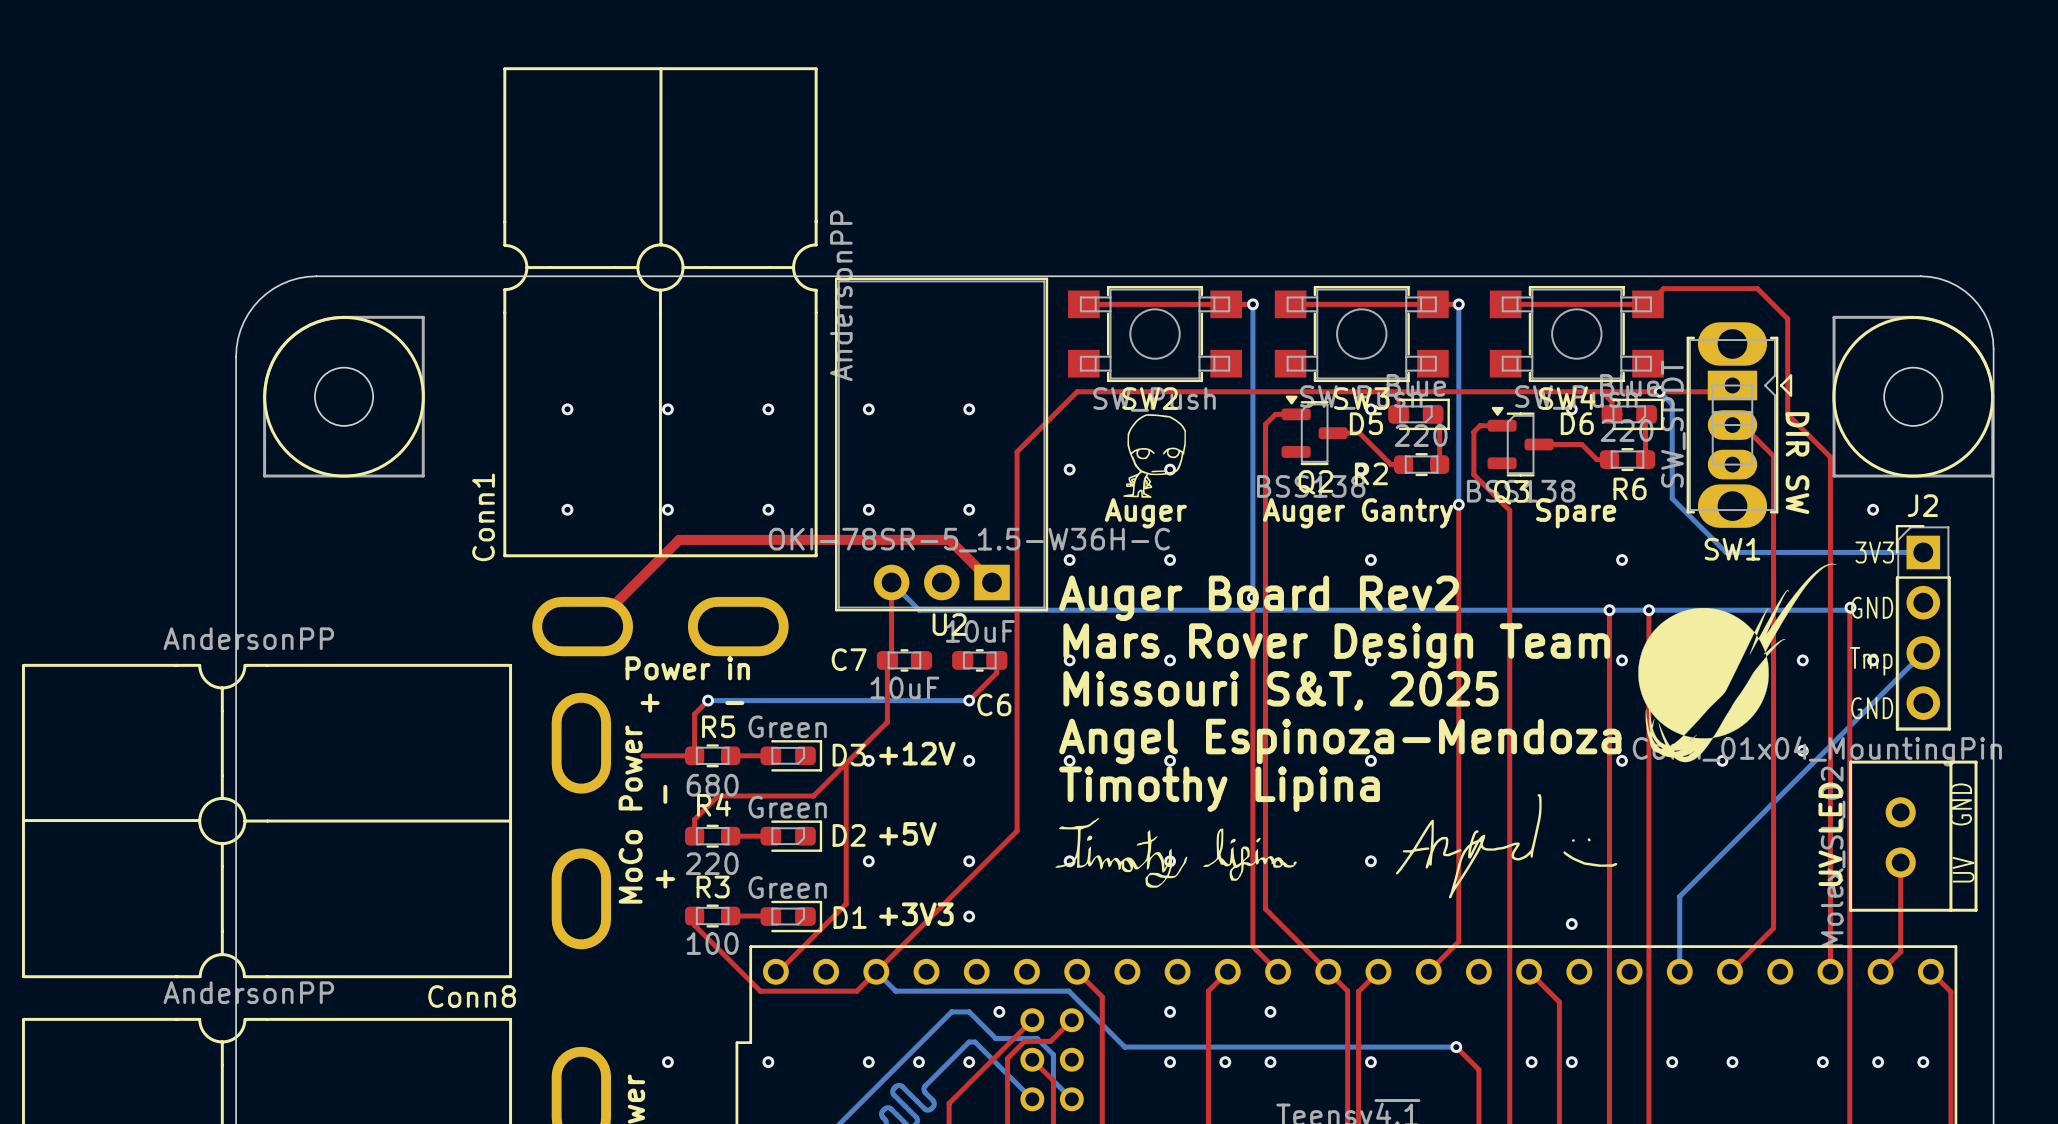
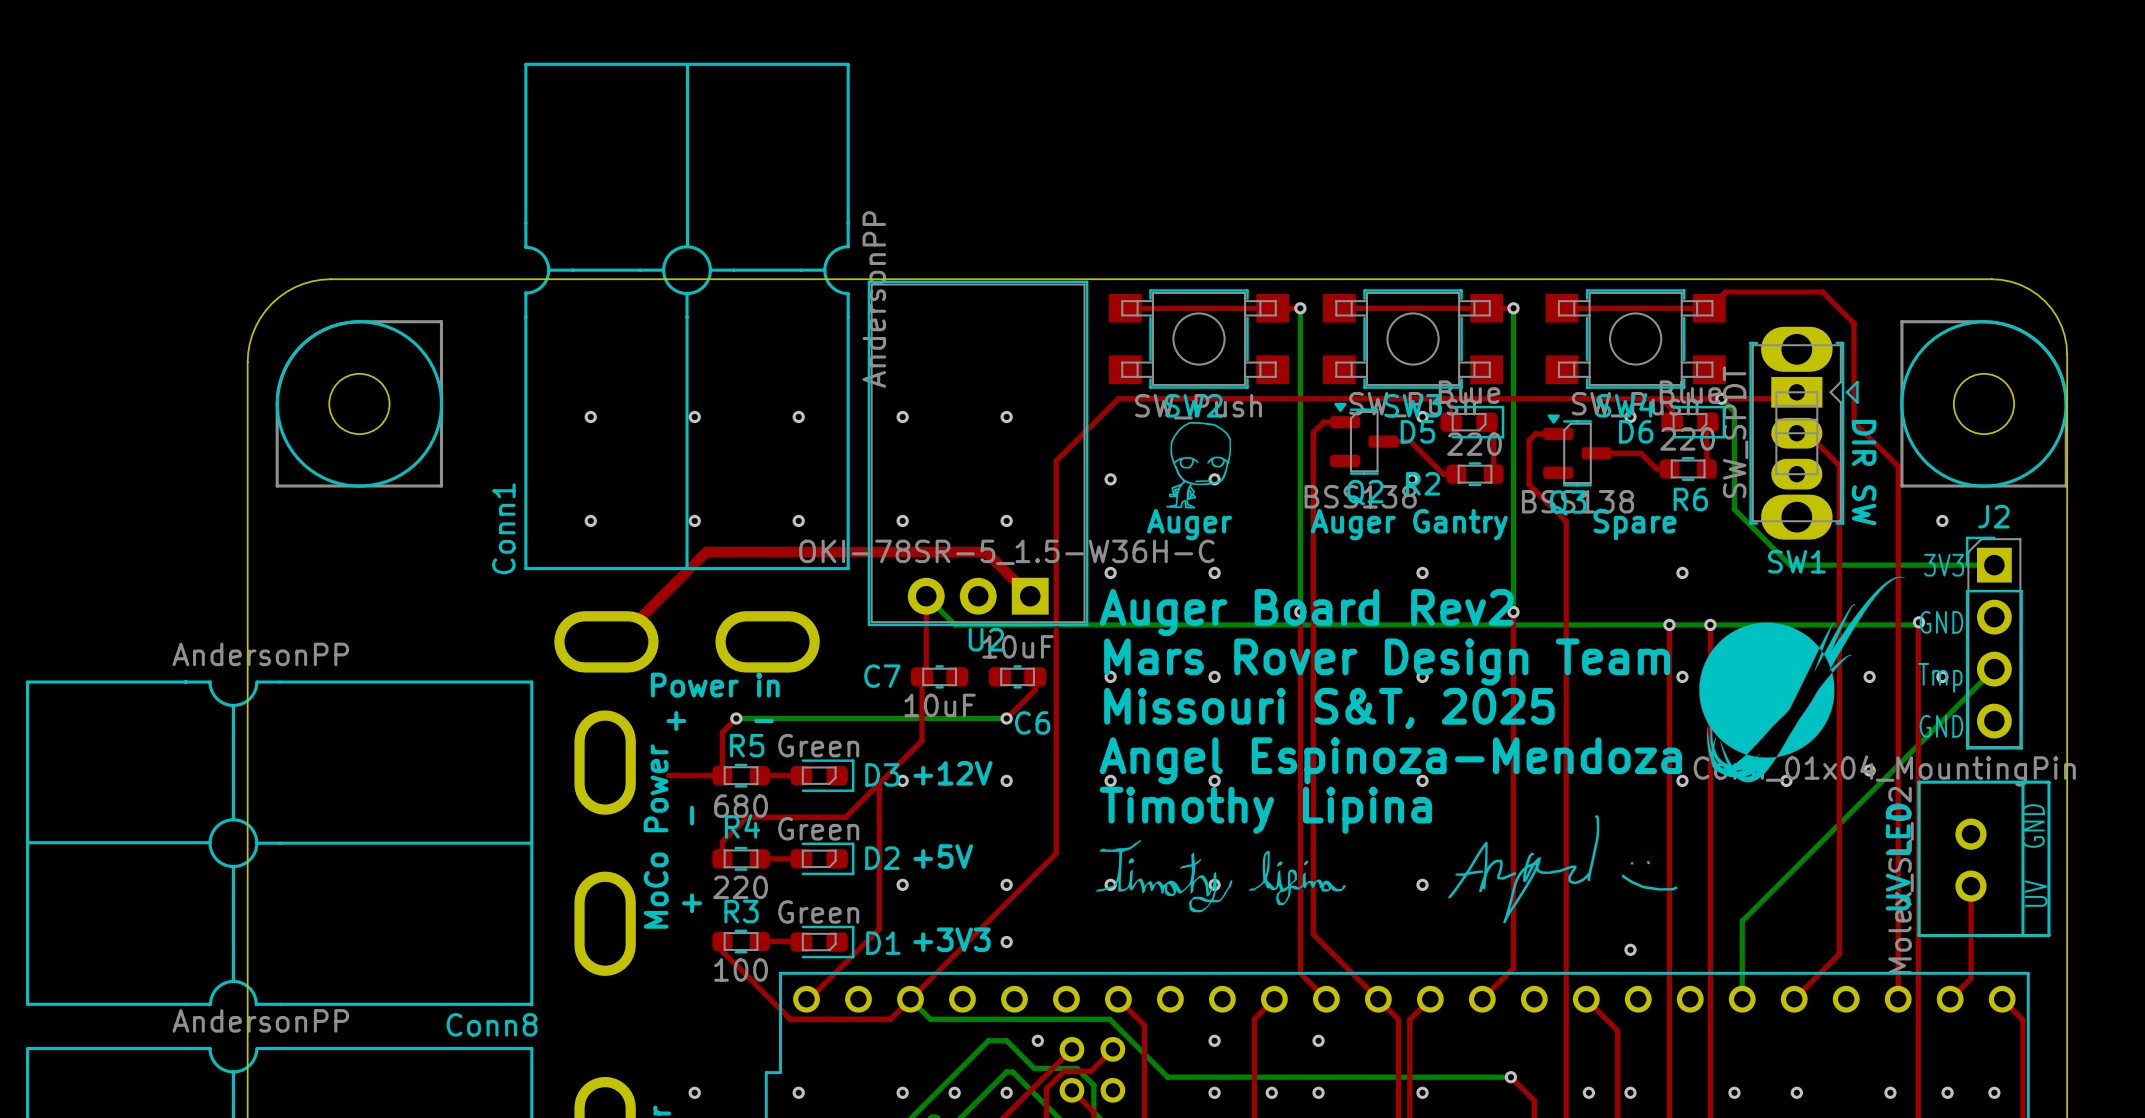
top track: (1458, 504) (1458, 597) -> none
bottom track: none -> (1513, 515) (1513, 612)
via position: (1458, 504) -> (1513, 612)

